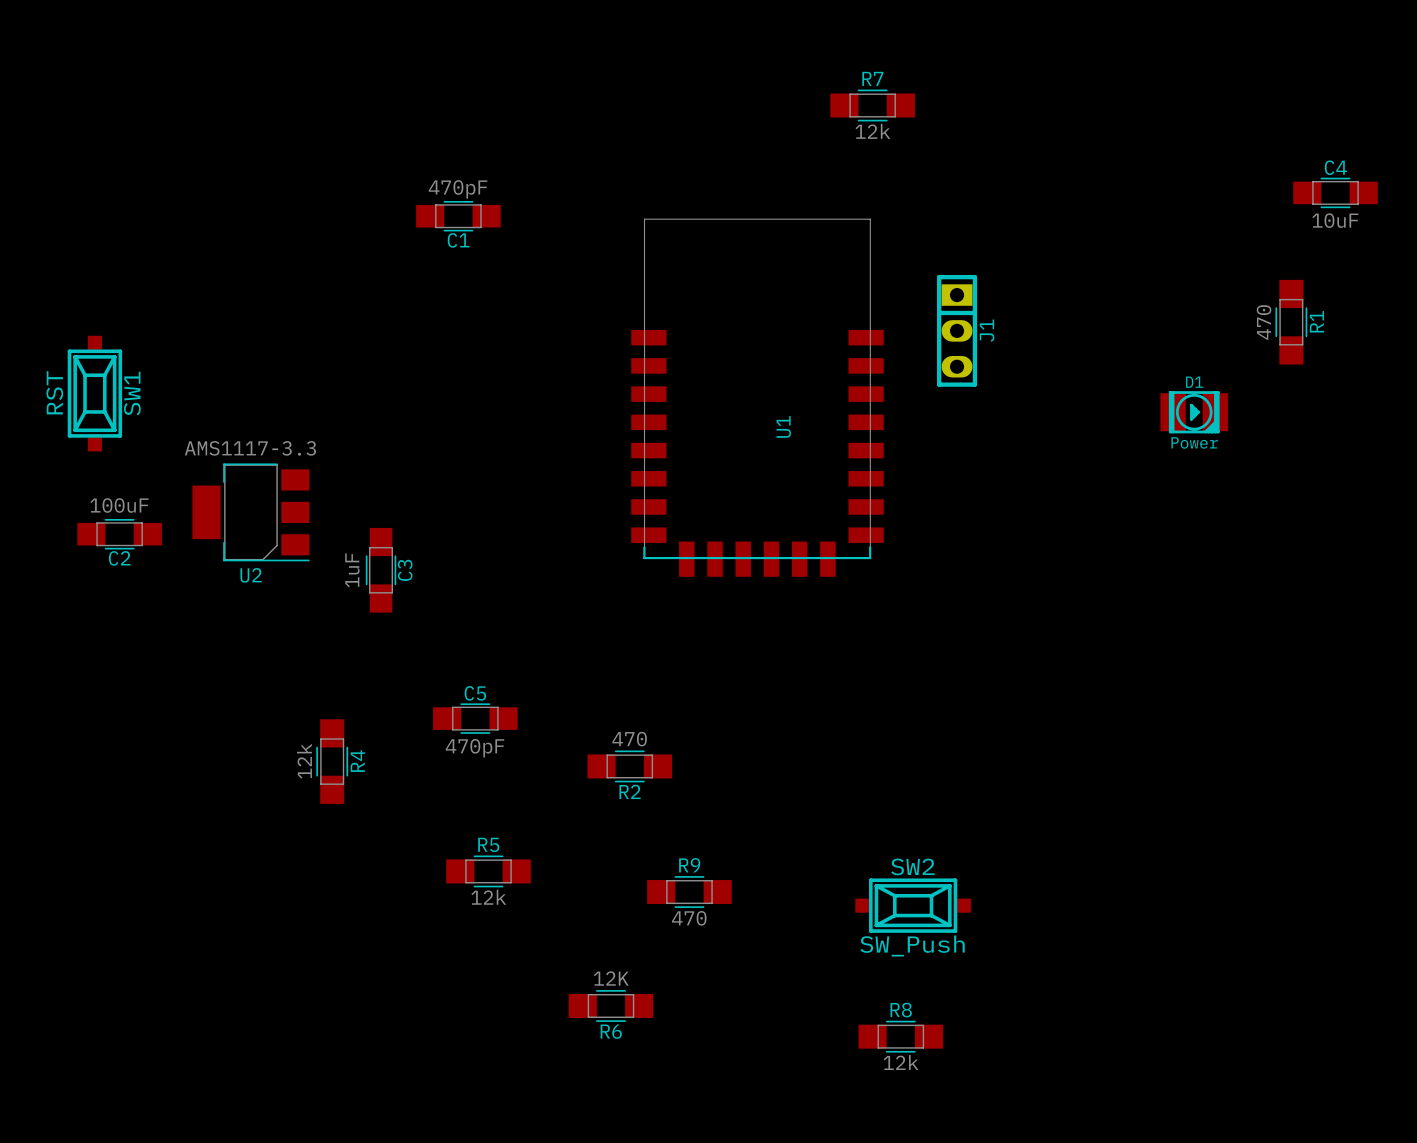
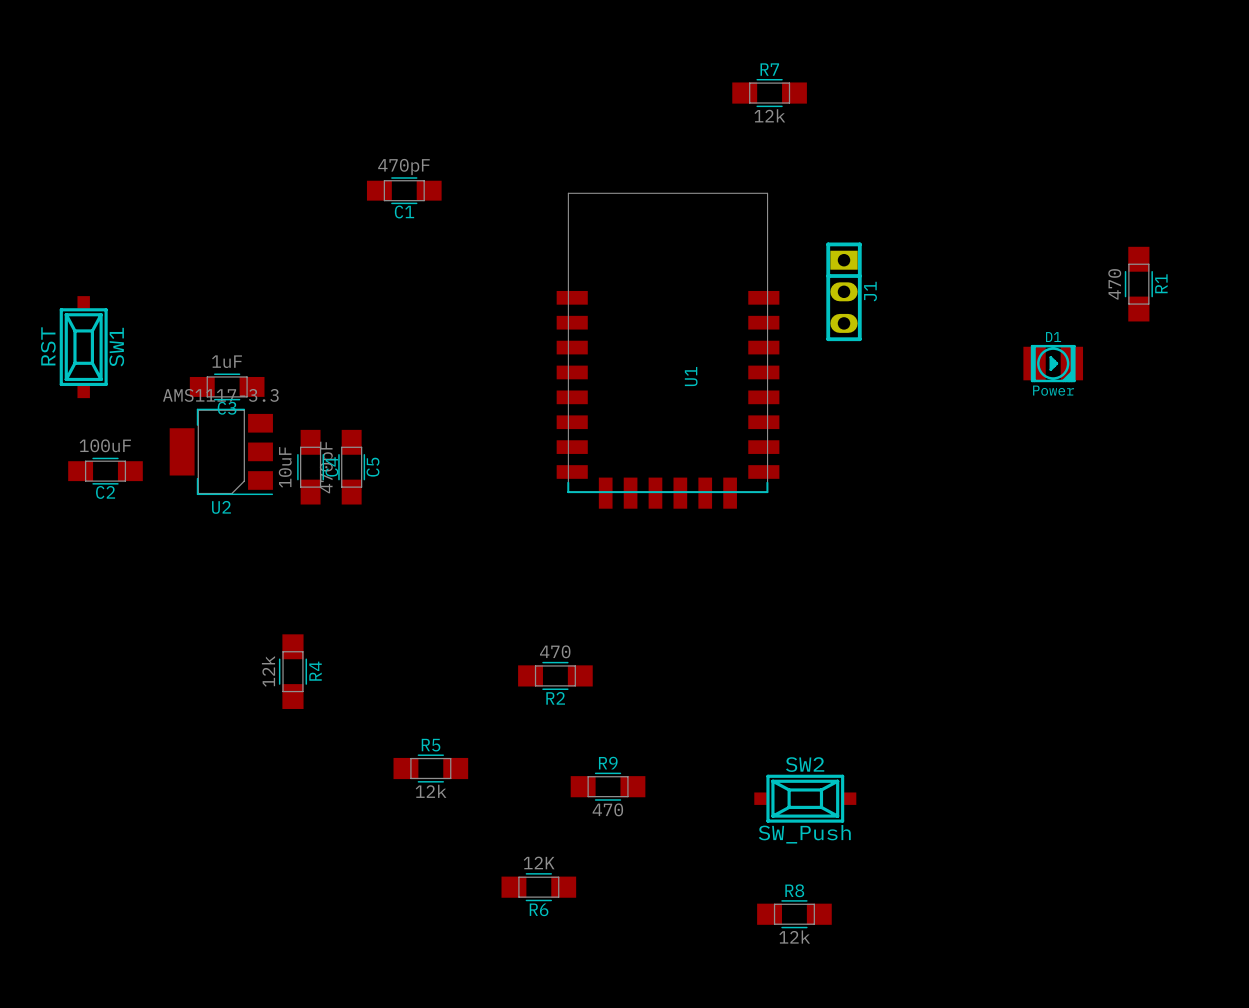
C4 rotation: 0° (1335, 192) -> 90° clockwise (310, 467)
C4 position: (1335, 192) -> (310, 467)
C3 rotation: 0° (381, 570) -> 90° clockwise (227, 386)
C3 position: (381, 570) -> (227, 386)
C5 rotation: 0° (475, 718) -> 90° clockwise (351, 467)
C5 position: (475, 718) -> (351, 467)

